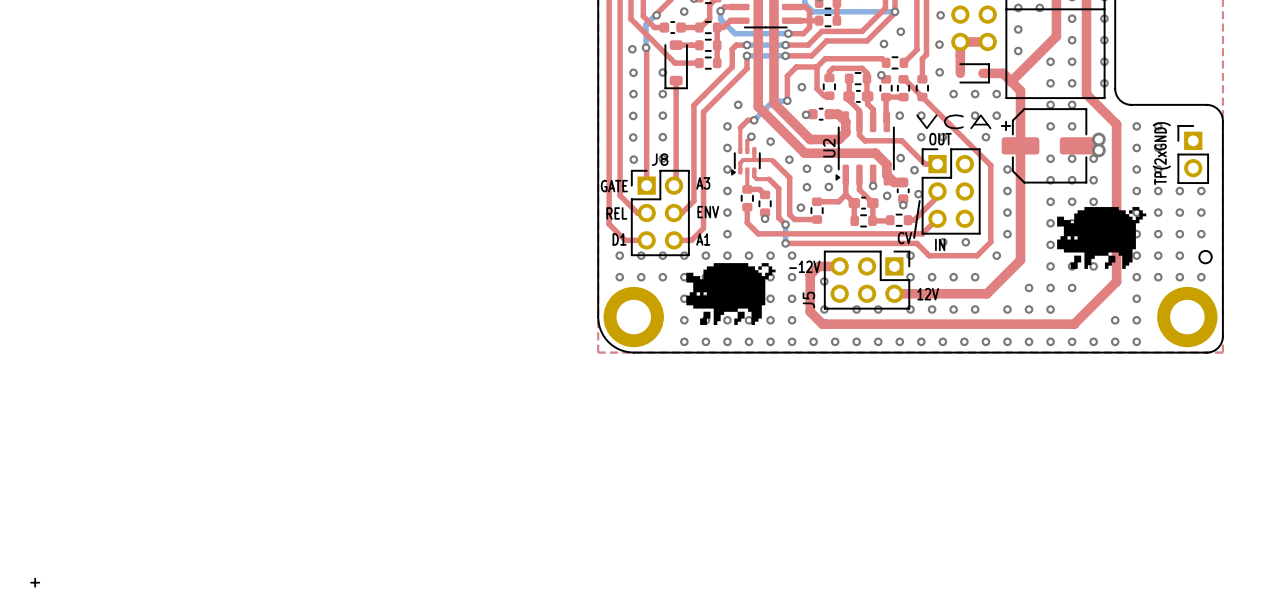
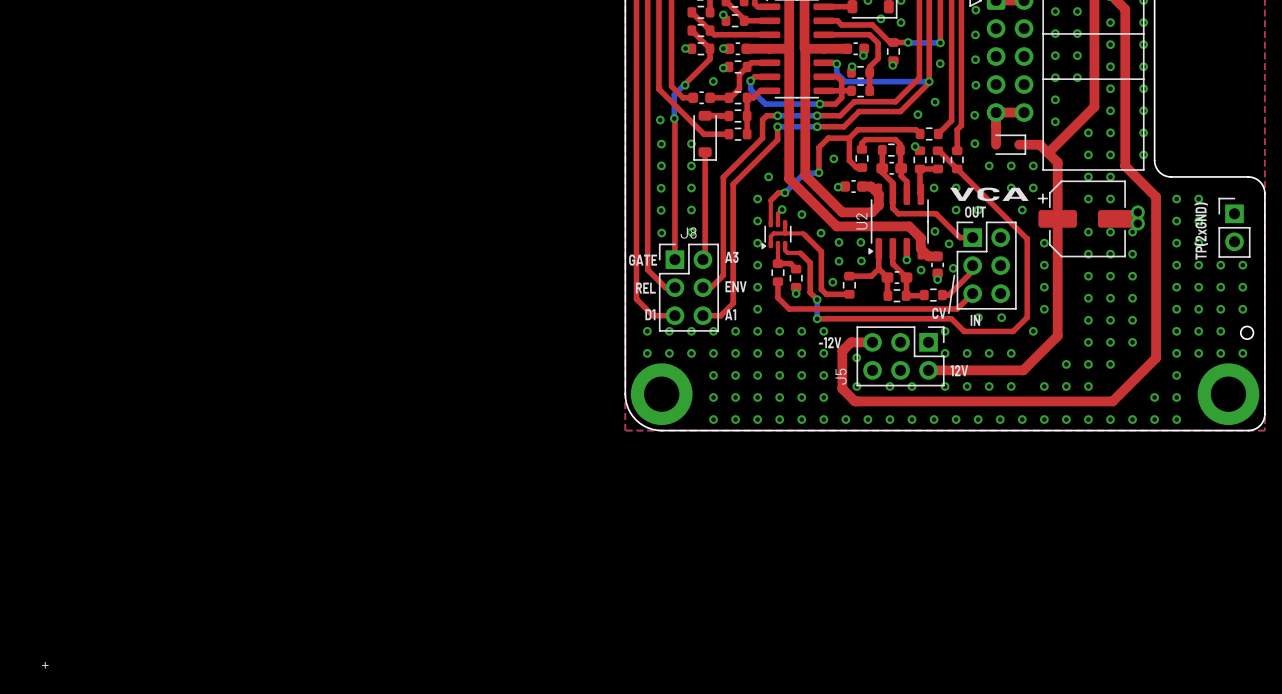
drawing: [1057, 206, 1147, 269] -> none
drawing: [686, 263, 776, 326] -> none

